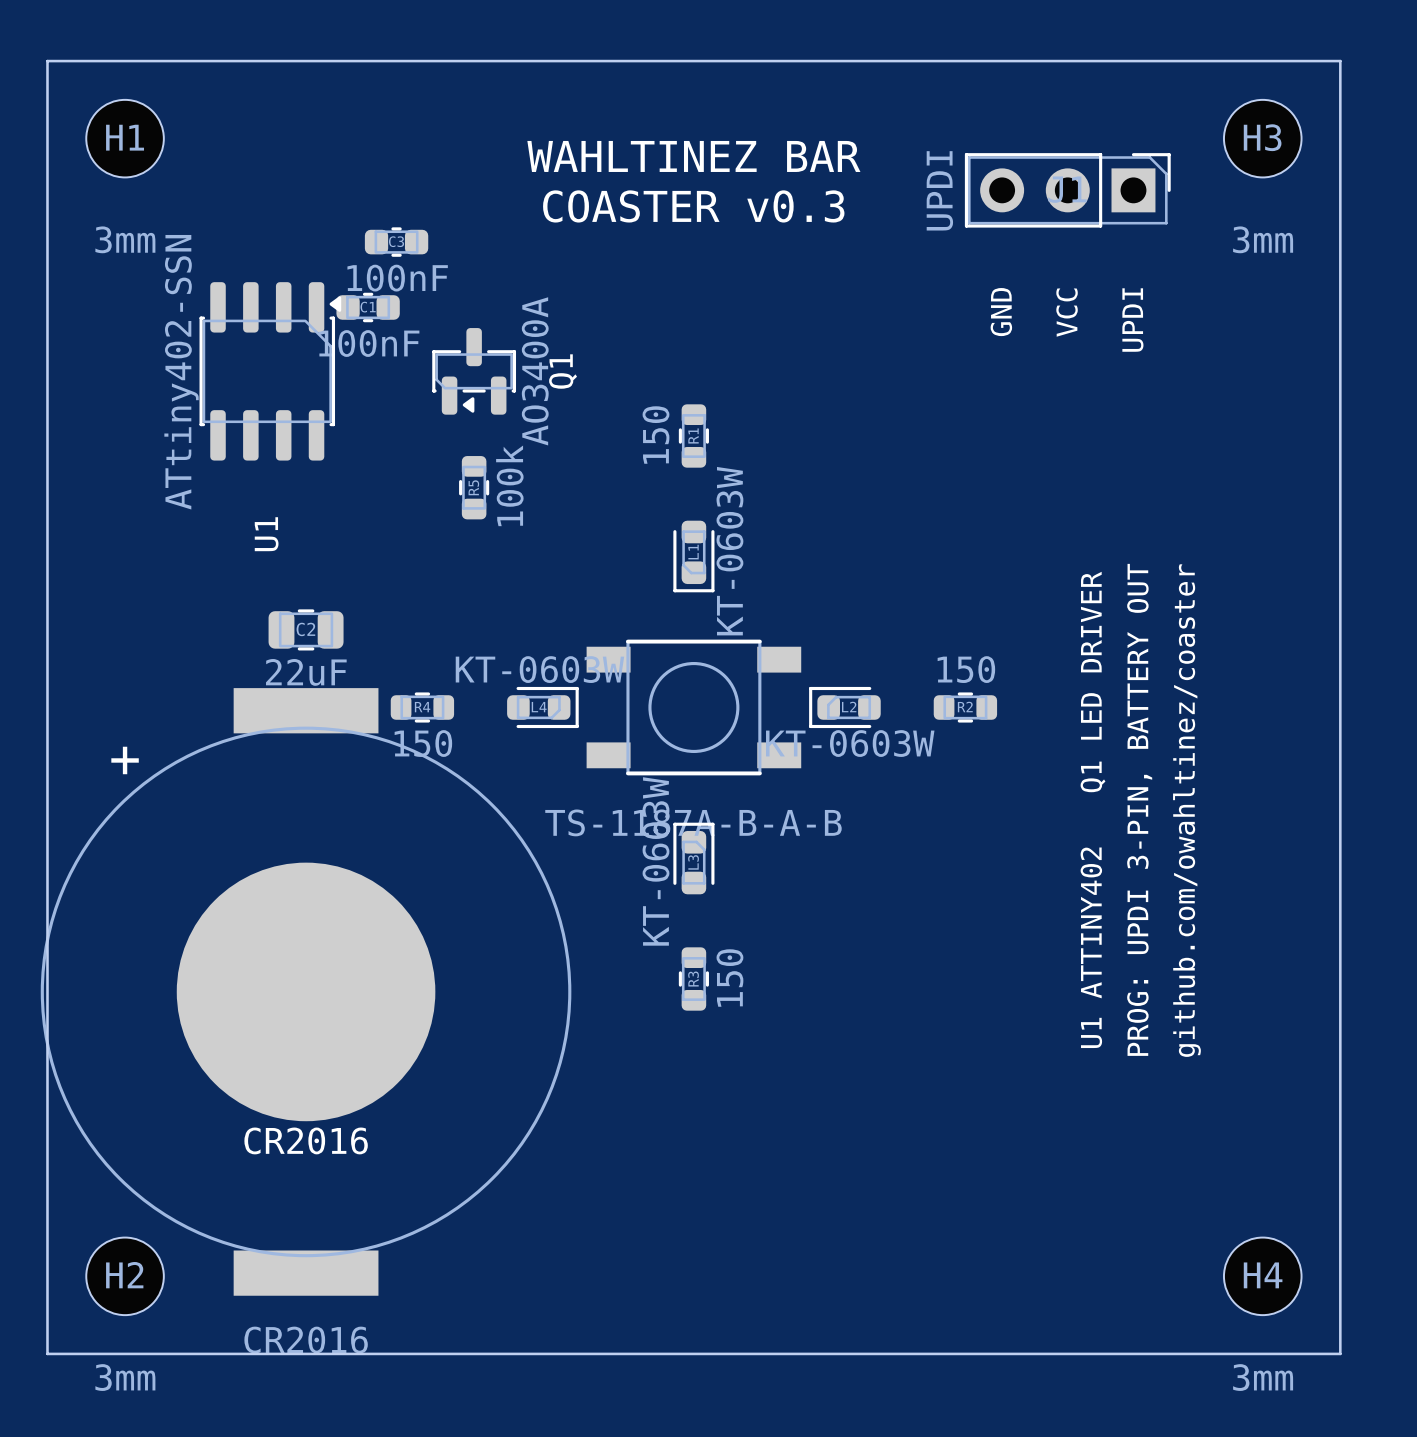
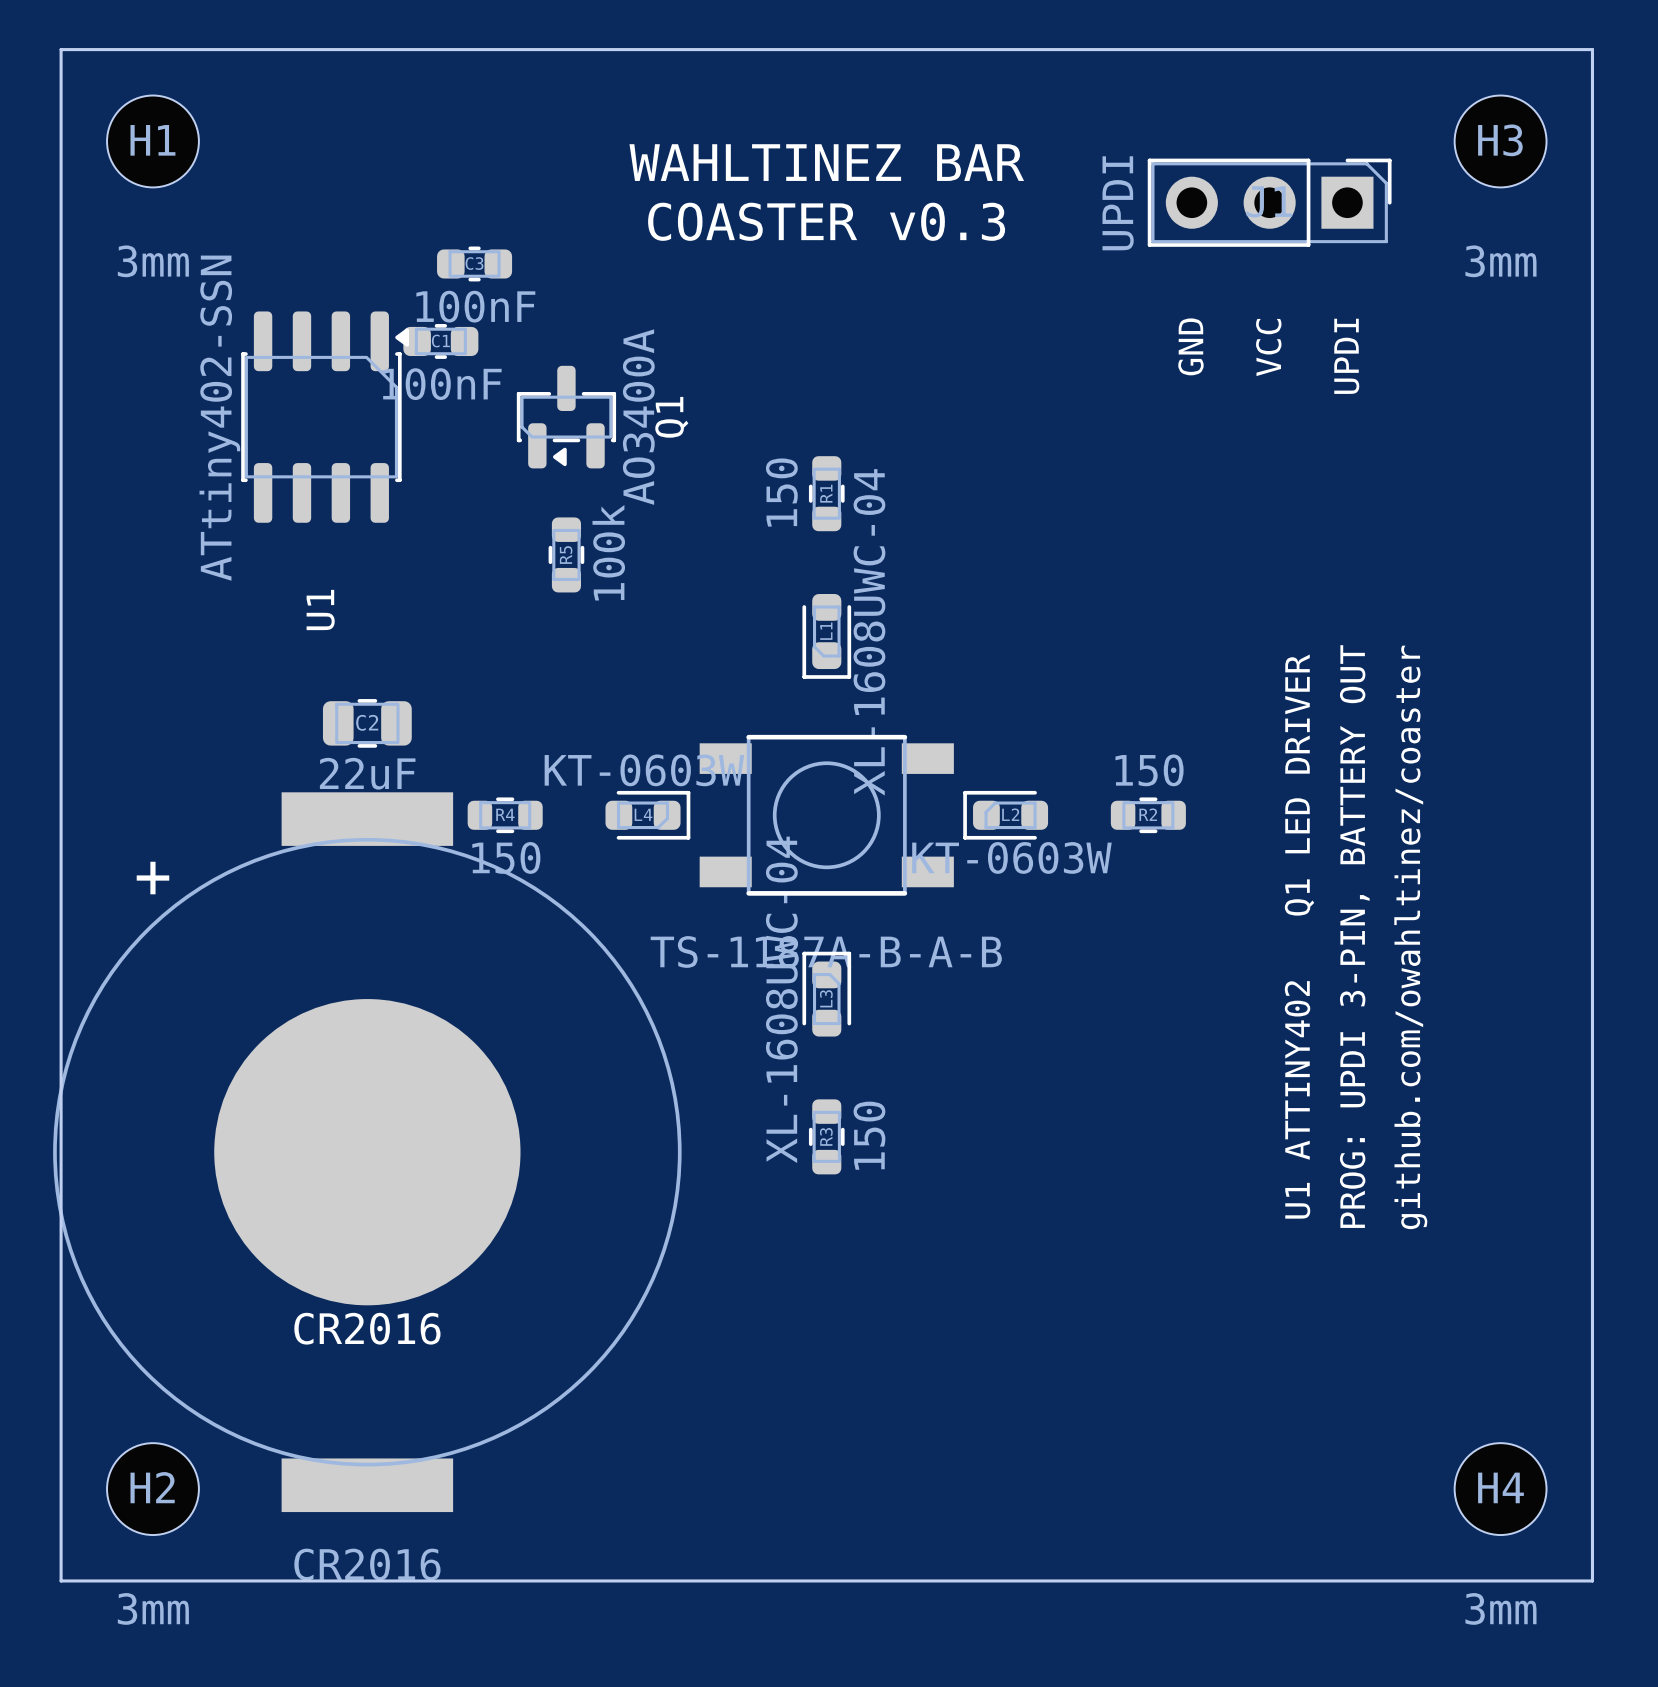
L1 value: KT-0603W (729, 551) -> XL-1608UWC-04 (869, 632)
L3 value: KT-0603W (655, 861) -> XL-1608UWC-04 (781, 999)

